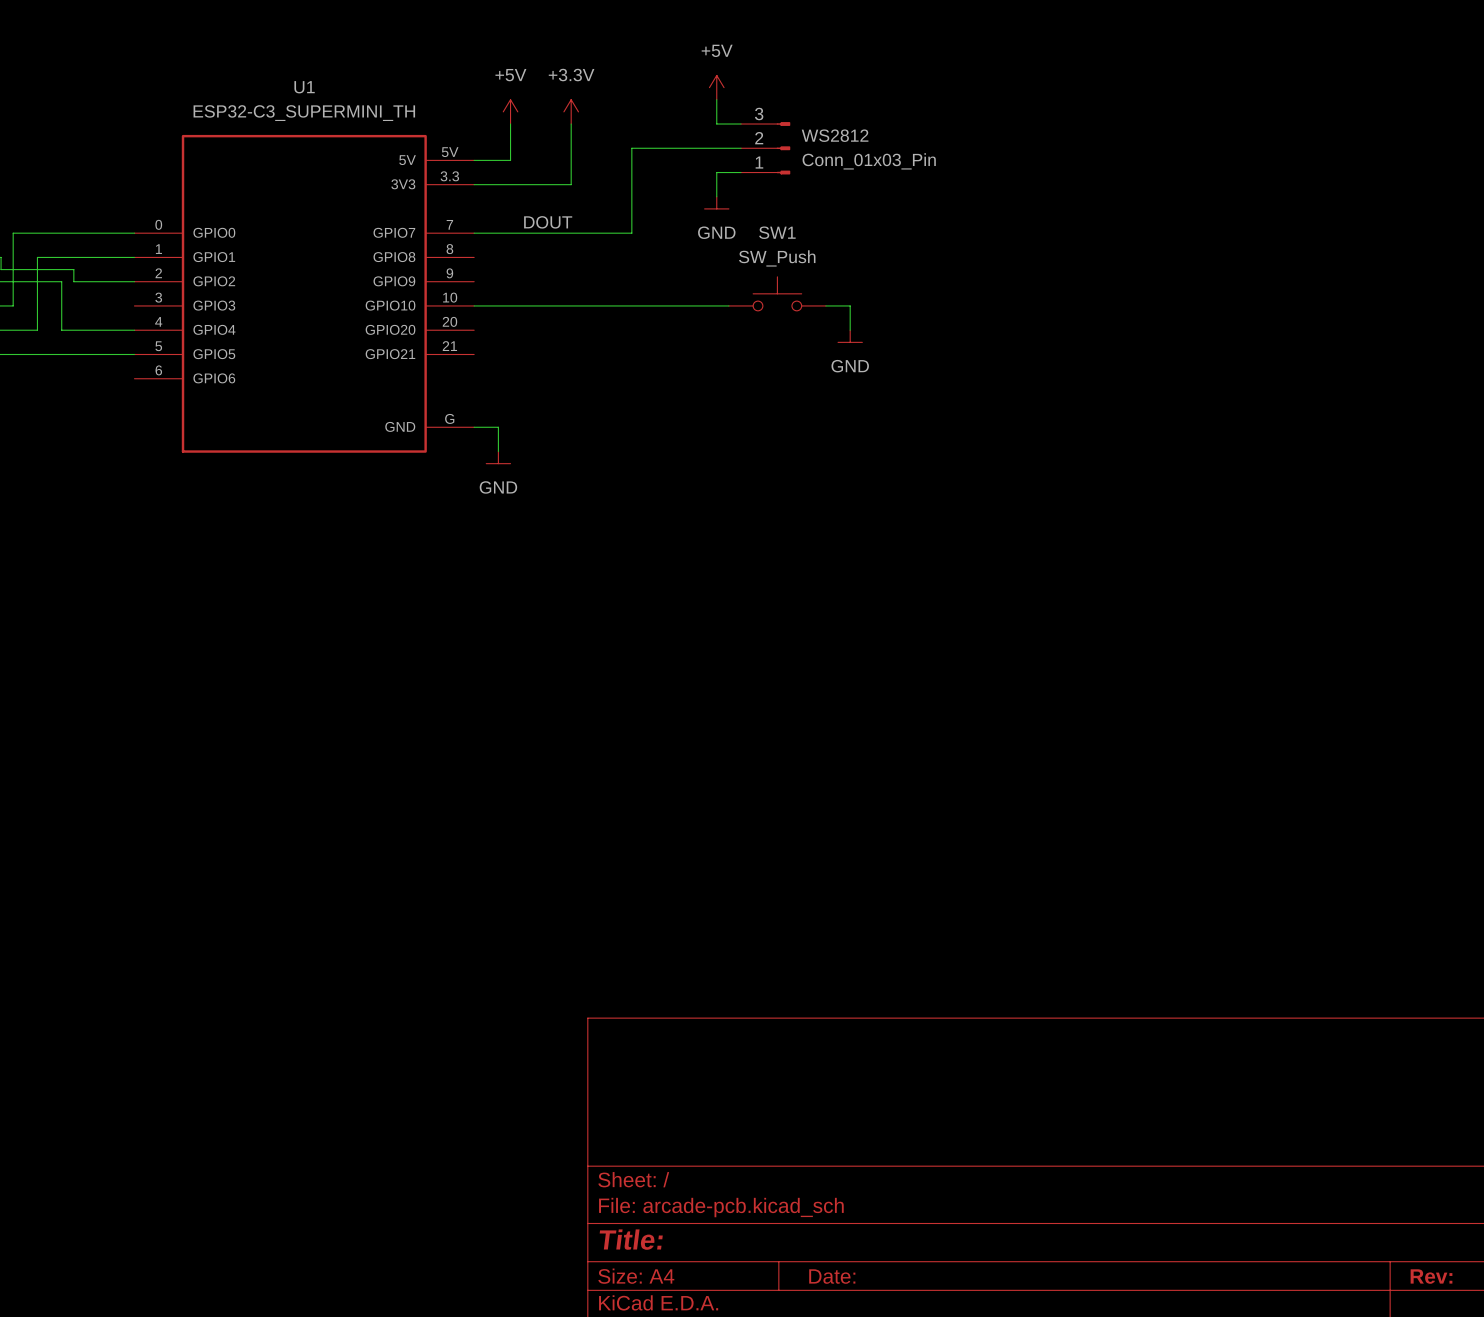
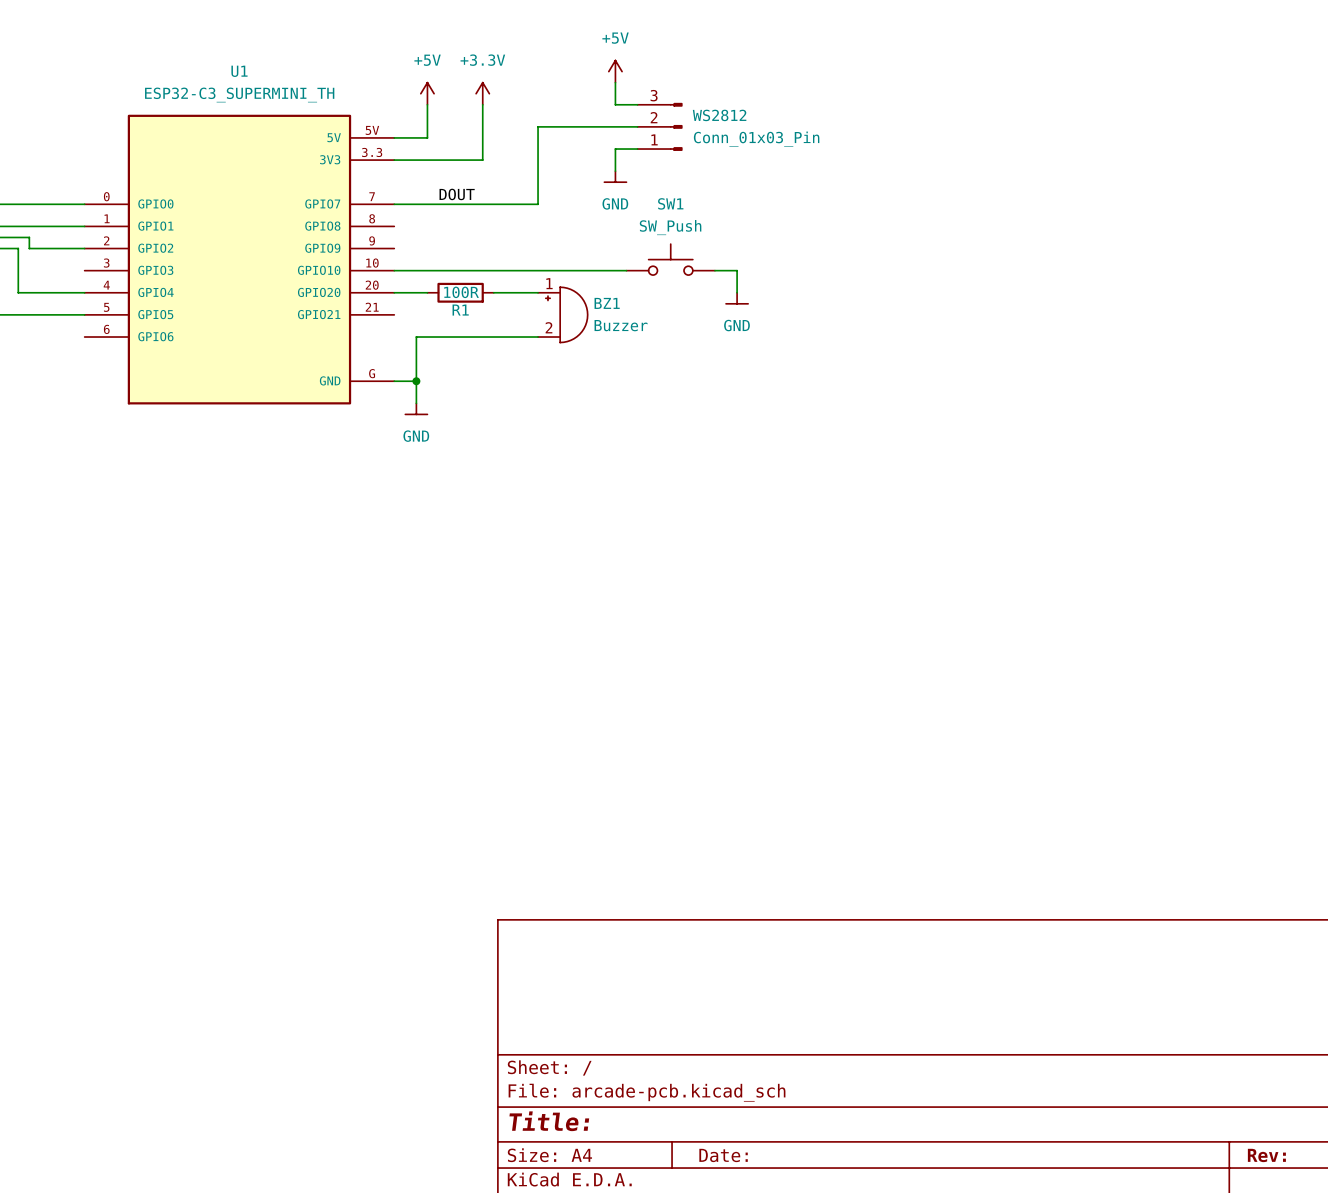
wire: none -> (394, 292) (427, 292)
R1: none -> 100R (460, 292)
wire: none -> (493, 292) (538, 292)
BZ1: none -> Buzzer (562, 314)
wire: none -> (538, 337) (416, 337) (416, 381)
junction: none -> (416, 381)

